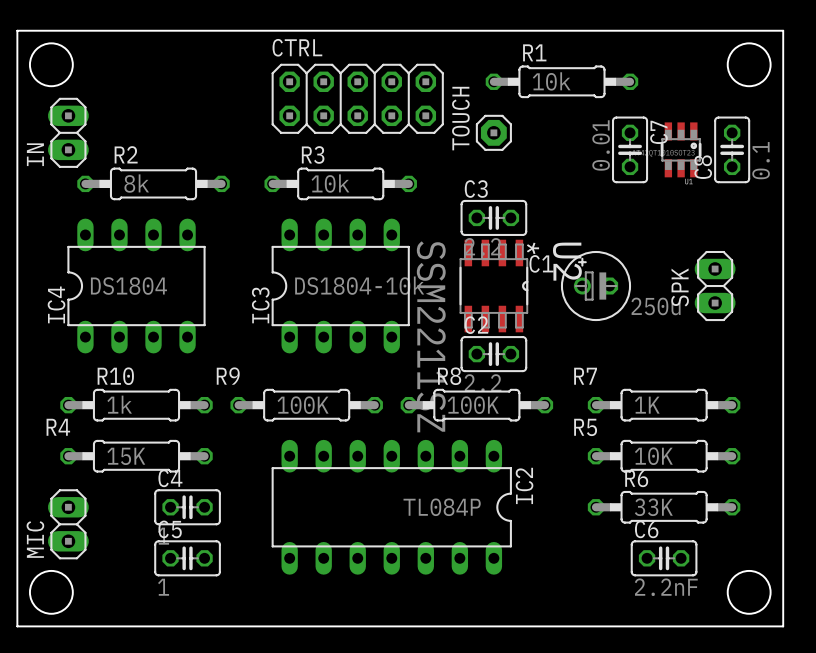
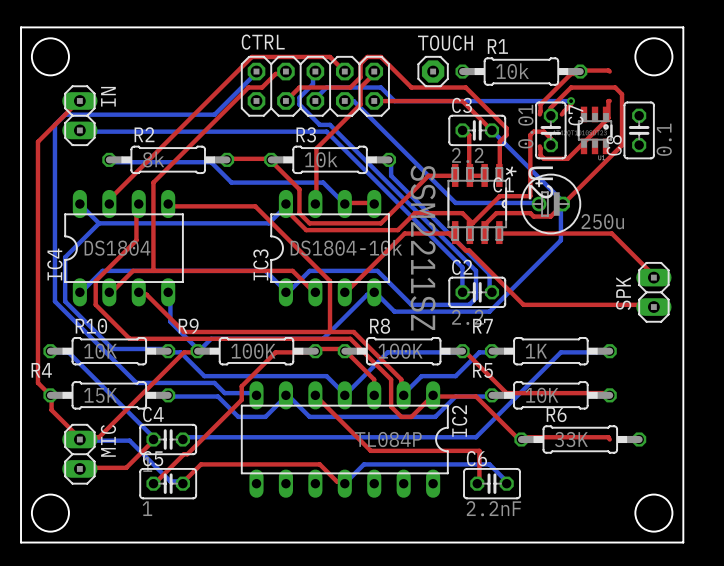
bottom track: none -> (256, 71) (214, 114) (65, 114) (54, 124) (54, 301) (136, 382) (214, 382) (224, 393) (255, 393) (256, 395)
top track: none -> (285, 71) (285, 73) (275, 73) (262, 87) (248, 87) (153, 182) (153, 270)
bottom track: none -> (315, 71) (313, 73) (313, 84) (299, 97) (299, 104) (319, 124) (330, 124) (476, 270) (476, 298) (469, 304) (411, 304) (377, 270) (309, 270) (285, 292) (265, 270) (102, 270) (79, 292)
top track: none -> (344, 71) (330, 56) (251, 56) (112, 196) (112, 202) (109, 204)
top track: none -> (374, 71) (360, 87) (360, 104) (316, 148) (315, 204)
R1 position: (561, 81) -> (521, 71)
top track: none -> (609, 71) (581, 70) (577, 73) (571, 73) (540, 104) (539, 114)
top track: none -> (79, 100) (37, 141) (37, 382) (51, 396) (51, 410) (79, 439) (82, 437) (99, 437) (184, 352) (197, 351)
top track: none -> (285, 100) (299, 87) (350, 87) (360, 77) (360, 63) (367, 56) (380, 56) (411, 87) (465, 87) (506, 128) (506, 135) (499, 141) (499, 175)
bottom track: none -> (315, 100) (326, 87) (380, 87) (394, 101) (571, 101)
bottom track: none -> (344, 100) (353, 101) (455, 202) (539, 204)
top track: none -> (374, 100) (462, 101) (491, 130)
top track: none -> (571, 101) (571, 104) (561, 114)
via: none -> (571, 101)
top track: none -> (609, 100) (608, 118) (567, 158) (543, 158) (540, 155) (539, 146)
TOUCH name rotation: 0° (460, 118) -> 90° clockwise (445, 42)
top track: none -> (550, 114) (550, 107) (571, 87) (615, 87) (622, 94) (622, 145) (550, 216) (533, 216) (530, 213) (496, 213) (486, 223) (484, 232)
IN position: (68, 132) -> (79, 115)
TOUCH position: (493, 132) -> (433, 71)
bottom track: none -> (79, 130) (326, 131) (462, 267) (462, 292)
top track: none -> (462, 130) (469, 135) (469, 175) (484, 175)
bottom track: none -> (491, 130) (564, 202) (560, 206) (560, 240) (489, 311) (394, 311) (374, 292) (374, 294) (367, 294) (323, 338) (211, 338) (197, 351) (170, 321) (170, 294) (168, 292)
IN name position: IN (35, 154) -> IN (108, 96)
top track: none -> (550, 146) (550, 138) (543, 131) (533, 131) (530, 135) (530, 196) (499, 196) (472, 223) (462, 213) (414, 213) (397, 230) (306, 230) (289, 213) (289, 206) (285, 204)
bottom track: none -> (109, 159) (112, 162) (211, 162) (231, 182) (323, 182) (344, 204)
R2 position: (153, 183) -> (168, 159)
top track: none -> (227, 159) (271, 159) (299, 189) (299, 213) (309, 223) (380, 223) (428, 175) (455, 175)
R3 position: (340, 183) -> (330, 159)
bottom track: none -> (388, 159) (391, 162) (391, 175) (489, 274) (489, 291) (491, 292)
C3 position: (493, 217) -> (477, 130)
bottom track: none -> (79, 204) (99, 223)
top track: none -> (138, 204) (136, 206) (136, 240) (95, 281) (95, 304) (129, 338) (350, 338) (391, 379) (391, 406) (401, 416) (411, 416) (433, 395) (476, 396) (516, 437) (608, 437) (609, 439)
top track: none -> (168, 204) (170, 206) (255, 206) (330, 281) (330, 332)
bottom track: none -> (285, 204) (285, 206) (268, 223) (99, 223)
top track: none -> (344, 204) (374, 204)
bottom track: none -> (99, 223) (65, 257) (65, 301) (112, 348) (167, 348) (170, 352) (180, 352) (204, 376) (326, 376) (344, 395) (387, 352) (462, 351)
top track: none -> (455, 232) (404, 233) (344, 292)
top track: none -> (499, 232) (611, 233) (653, 277)
top track: none -> (448, 233) (465, 250) (469, 250) (523, 304) (652, 304) (653, 307)
IC3 position: (340, 286) -> (330, 248)
U2 position: (493, 286) -> (477, 204)
C1 position: (596, 286) -> (550, 204)
SPK position: (715, 286) -> (653, 292)
top track: none -> (109, 292) (133, 270) (292, 270) (315, 292)
top track: none -> (138, 292) (139, 294) (146, 294) (184, 332) (353, 332) (401, 379) (401, 393) (403, 395)
C2 position: (493, 354) -> (477, 292)
R10 value: 1k (119, 404) -> 10K (100, 351)
bottom track: none -> (50, 351) (68, 352) (153, 437) (153, 439)
R10 position: (136, 405) -> (109, 351)
R9 position: (306, 405) -> (256, 351)
R8 position: (476, 405) -> (403, 351)
top track: none -> (462, 351) (506, 393) (608, 393) (609, 395)
bottom track: none -> (491, 351) (479, 352) (455, 376) (421, 376) (403, 395)
R7 position: (664, 405) -> (550, 351)
bottom track: none -> (609, 351) (560, 352) (476, 437) (184, 437) (182, 439)
R4 position: (136, 456) -> (109, 395)
bottom track: none -> (168, 395) (217, 396) (238, 416) (265, 416) (285, 395) (309, 416) (435, 416) (455, 396) (491, 395)
top track: none -> (315, 395) (370, 450) (479, 450) (479, 481) (477, 483)
top track: none -> (374, 395) (374, 379) (343, 348) (316, 348) (313, 352) (275, 352) (241, 386) (241, 399) (187, 454) (184, 454) (153, 483)
R5 position: (664, 456) -> (550, 395)
bottom track: none -> (79, 439) (129, 440) (170, 481) (180, 481) (182, 483)
top track: none -> (153, 439) (126, 467) (79, 468)
MIC position: (68, 524) -> (79, 454)
MIC name position: MIC (35, 539) -> MIC (108, 440)
top track: none -> (182, 483) (200, 464) (319, 464) (336, 481) (343, 481) (344, 483)
bottom track: none -> (344, 483) (363, 464) (489, 464) (506, 483)
C6 position: (664, 558) -> (491, 483)

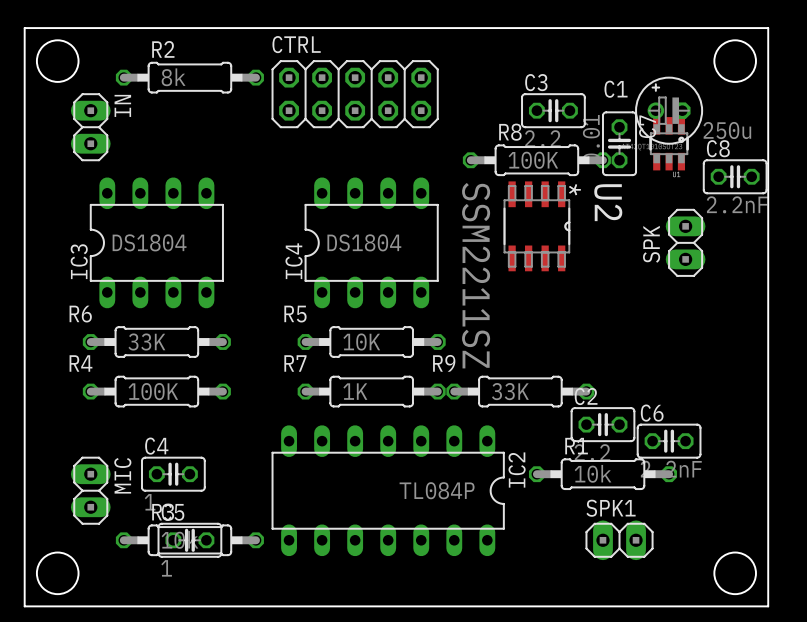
bottom track: (256, 71) (214, 114) (65, 114) (54, 124) (54, 301) (136, 382) (214, 382) (224, 393) (255, 393) (256, 395) -> none
top track: (285, 71) (285, 73) (275, 73) (262, 87) (248, 87) (153, 182) (153, 270) -> none
bottom track: (315, 71) (313, 73) (313, 84) (299, 97) (299, 104) (319, 124) (330, 124) (476, 270) (476, 298) (469, 304) (411, 304) (377, 270) (309, 270) (285, 292) (265, 270) (102, 270) (79, 292) -> none
top track: (344, 71) (330, 56) (251, 56) (112, 196) (112, 202) (109, 204) -> none
top track: (374, 71) (360, 87) (360, 104) (316, 148) (315, 204) -> none
TOUCH: (433, 71) -> none
R1 position: (521, 71) -> (602, 474)
top track: (609, 71) (581, 70) (577, 73) (571, 73) (540, 104) (539, 114) -> none
top track: (79, 100) (37, 141) (37, 382) (51, 396) (51, 410) (79, 439) (82, 437) (99, 437) (184, 352) (197, 351) -> none
top track: (285, 100) (299, 87) (350, 87) (360, 77) (360, 63) (367, 56) (380, 56) (411, 87) (465, 87) (506, 128) (506, 135) (499, 141) (499, 175) -> none
bottom track: (315, 100) (326, 87) (380, 87) (394, 101) (571, 101) -> none
bottom track: (344, 100) (353, 101) (455, 202) (539, 204) -> none
top track: (374, 100) (462, 101) (491, 130) -> none
top track: (609, 100) (608, 118) (567, 158) (543, 158) (540, 155) (539, 146) -> none
top track: (571, 101) (571, 104) (561, 114) -> none
via: (571, 101) -> none
top track: (550, 114) (550, 107) (571, 87) (615, 87) (622, 94) (622, 145) (550, 216) (533, 216) (530, 213) (496, 213) (486, 223) (484, 232) -> none
bottom track: (79, 130) (326, 131) (462, 267) (462, 292) -> none
top track: (462, 130) (469, 135) (469, 175) (484, 175) -> none
C3 position: (477, 130) -> (553, 110)
bottom track: (491, 130) (564, 202) (560, 206) (560, 240) (489, 311) (394, 311) (374, 292) (374, 294) (367, 294) (323, 338) (211, 338) (197, 351) (170, 321) (170, 294) (168, 292) -> none
C8 rotation: 0° (639, 130) -> 90° clockwise (735, 176)
C8 value: 0.1 (664, 139) -> 2.2nF (737, 204)
top track: (550, 146) (550, 138) (543, 131) (533, 131) (530, 135) (530, 196) (499, 196) (472, 223) (462, 213) (414, 213) (397, 230) (306, 230) (289, 213) (289, 206) (285, 204) -> none
bottom track: (109, 159) (112, 162) (211, 162) (231, 182) (323, 182) (344, 204) -> none
R2 position: (168, 159) -> (189, 77)
top track: (227, 159) (271, 159) (299, 189) (299, 213) (309, 223) (380, 223) (428, 175) (455, 175) -> none
R3 position: (330, 159) -> (189, 540)
bottom track: (388, 159) (391, 162) (391, 175) (489, 274) (489, 291) (491, 292) -> none
bottom track: (79, 204) (99, 223) -> none
top track: (138, 204) (136, 206) (136, 240) (95, 281) (95, 304) (129, 338) (350, 338) (391, 379) (391, 406) (401, 416) (411, 416) (433, 395) (476, 396) (516, 437) (608, 437) (609, 439) -> none
top track: (168, 204) (170, 206) (255, 206) (330, 281) (330, 332) -> none
bottom track: (285, 204) (285, 206) (268, 223) (99, 223) -> none
top track: (344, 204) (374, 204) -> none
C1 position: (550, 204) -> (669, 110)
bottom track: (99, 223) (65, 257) (65, 301) (112, 348) (167, 348) (170, 352) (180, 352) (204, 376) (326, 376) (344, 395) (387, 352) (462, 351) -> none
top track: (455, 232) (404, 233) (344, 292) -> none
top track: (499, 232) (611, 233) (653, 277) -> none
top track: (448, 233) (465, 250) (469, 250) (523, 304) (652, 304) (653, 307) -> none
IC3 value: DS1804-10k (346, 247) -> DS1804 (149, 242)
IC4 position: (124, 248) -> (371, 242)
IC3 position: (330, 248) -> (156, 242)
top track: (109, 292) (133, 270) (292, 270) (315, 292) -> none
top track: (138, 292) (139, 294) (146, 294) (184, 332) (353, 332) (401, 379) (401, 393) (403, 395) -> none
C2 position: (477, 292) -> (602, 424)
SPK position: (653, 292) -> (685, 242)
bottom track: (50, 351) (68, 352) (153, 437) (153, 439) -> none
R10: 10K (109, 351) -> none
R9 value: 100K (253, 351) -> 33K (510, 391)
R9 position: (256, 351) -> (520, 391)
R8 position: (403, 351) -> (536, 160)
top track: (462, 351) (506, 393) (608, 393) (609, 395) -> none
bottom track: (491, 351) (479, 352) (455, 376) (421, 376) (403, 395) -> none
R7 position: (550, 351) -> (371, 391)
bottom track: (609, 351) (560, 352) (476, 437) (184, 437) (182, 439) -> none
R4 value: 15K (100, 395) -> 100K (153, 391)
R4 position: (109, 395) -> (156, 391)
bottom track: (168, 395) (217, 396) (238, 416) (265, 416) (285, 395) (309, 416) (435, 416) (455, 396) (491, 395) -> none
top track: (315, 395) (370, 450) (479, 450) (479, 481) (477, 483) -> none
top track: (374, 395) (374, 379) (343, 348) (316, 348) (313, 352) (275, 352) (241, 386) (241, 399) (187, 454) (184, 454) (153, 483) -> none
R5 position: (550, 395) -> (371, 342)
R6 name position: R6 (556, 414) -> R6 (80, 314)
bottom track: (79, 439) (129, 440) (170, 481) (180, 481) (182, 483) -> none
top track: (153, 439) (126, 467) (79, 468) -> none
C4 position: (168, 439) -> (173, 474)
R6 position: (580, 439) -> (156, 342)
MIC position: (79, 454) -> (90, 490)
top track: (182, 483) (200, 464) (319, 464) (336, 481) (343, 481) (344, 483) -> none
bottom track: (344, 483) (363, 464) (489, 464) (506, 483) -> none
C6 position: (491, 483) -> (669, 441)
SPK1: none -> (619, 540)

